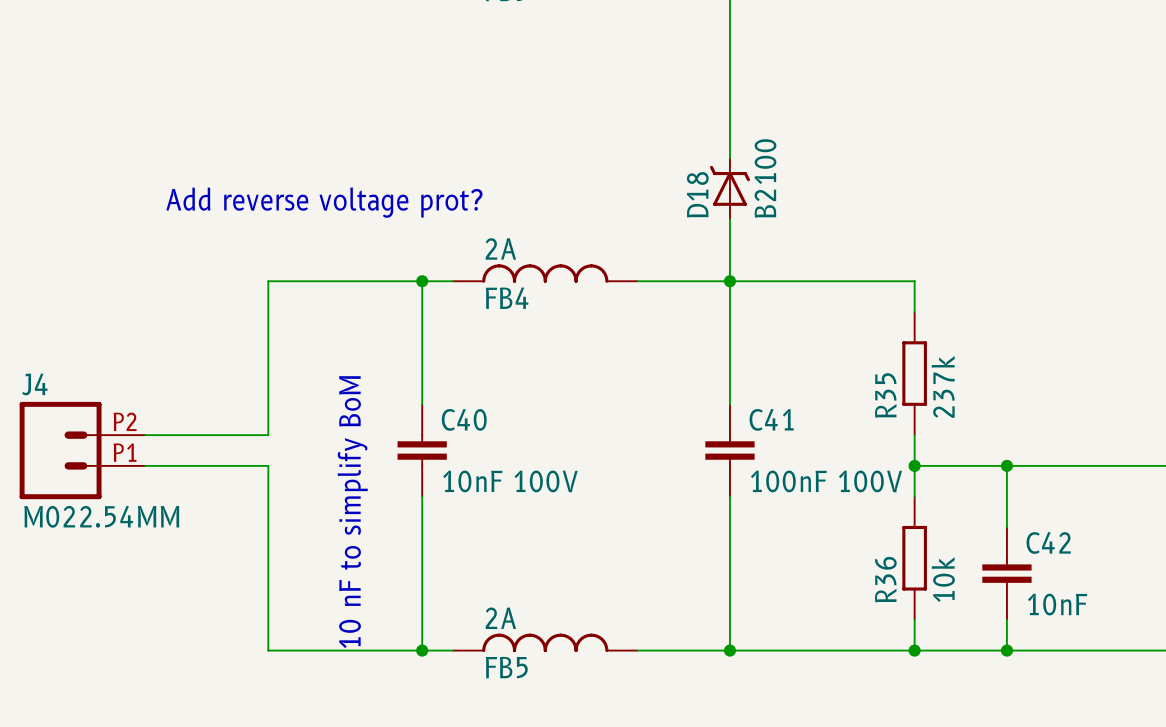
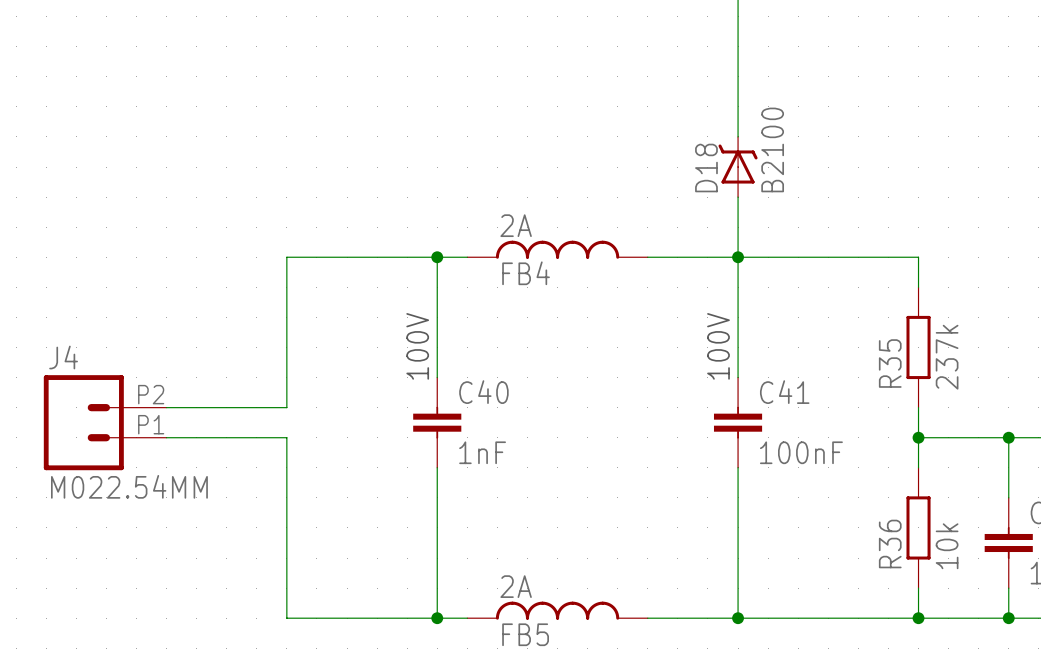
text: Add reverse voltage prot? (324, 202) -> none
text: none -> 100V (417, 346)
text: none -> 100V (718, 346)
C40 value: 10nF 100V (510, 481) -> 1nF (482, 452)
C41 value: 100nF 100V (826, 481) -> 100nF (801, 452)
text: 10 nF to simplify BoM (352, 512) -> none

